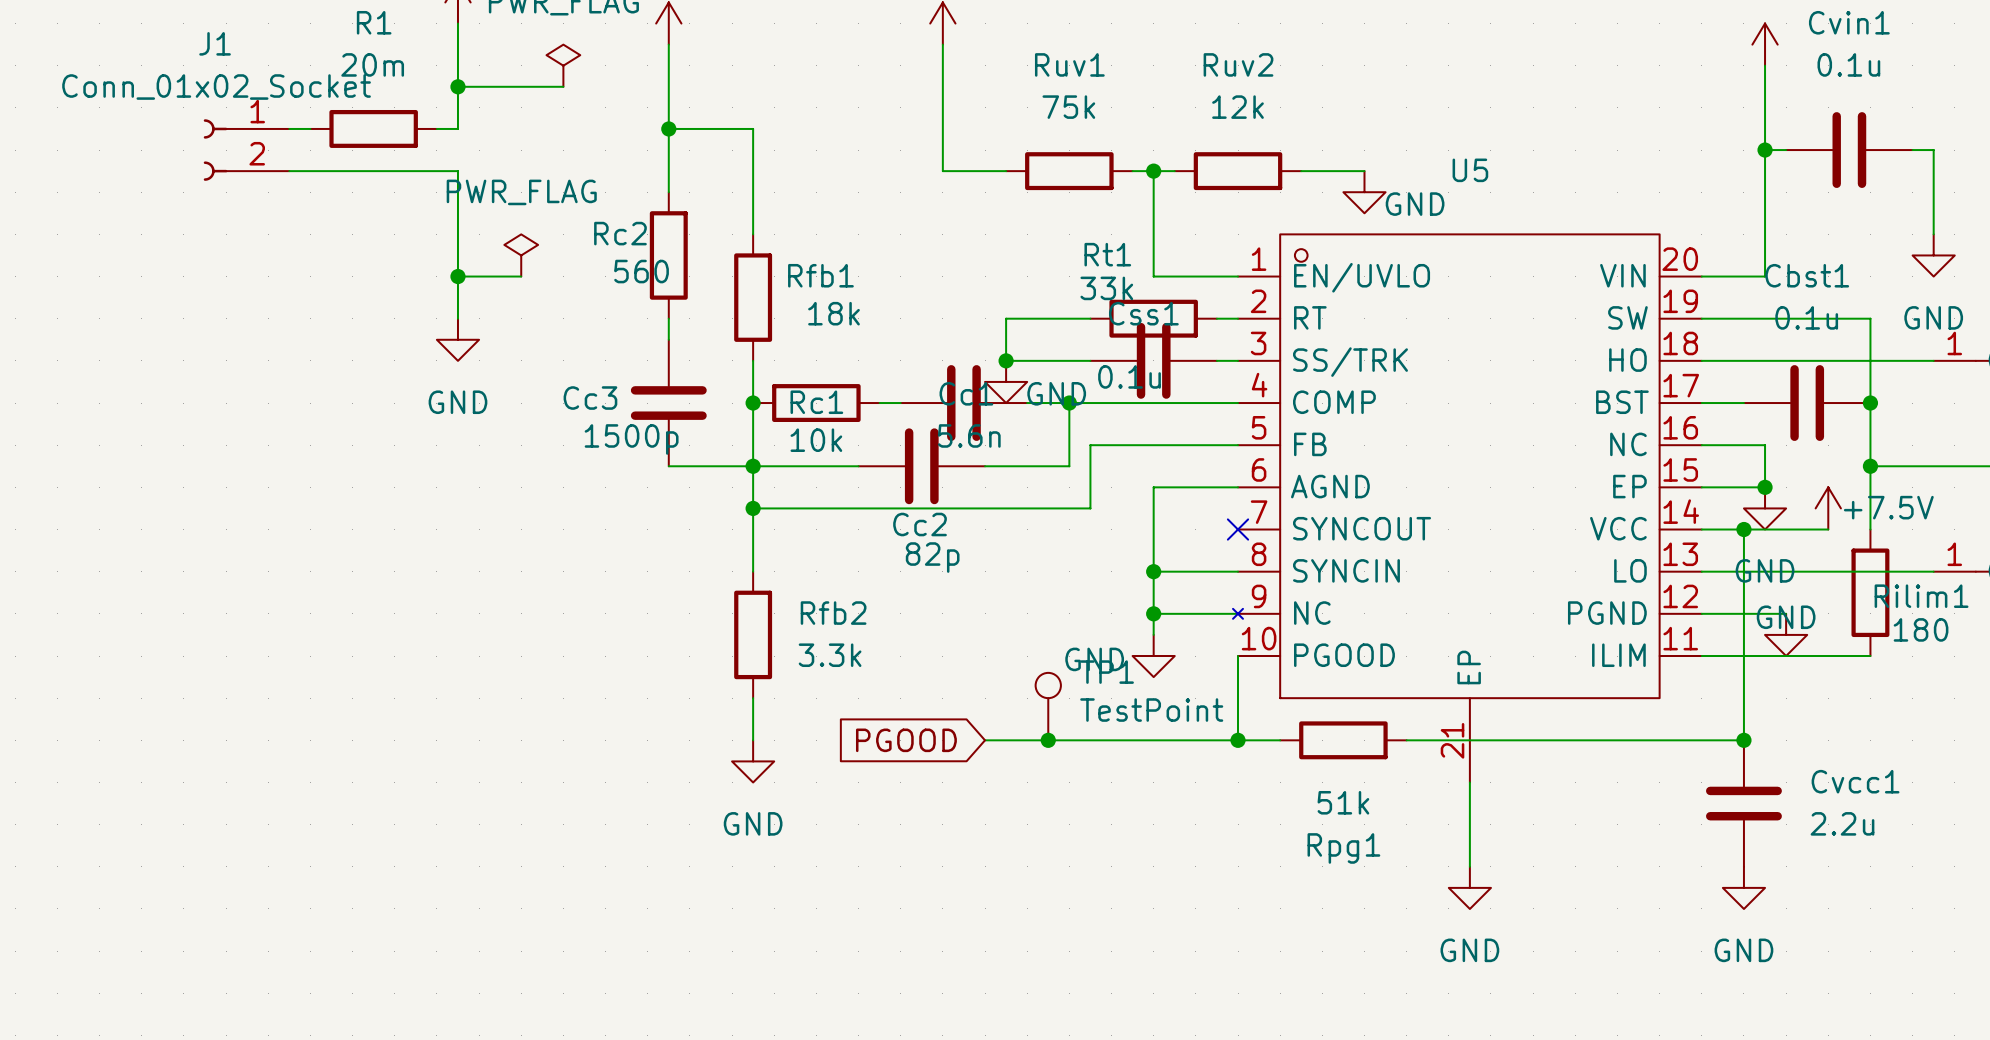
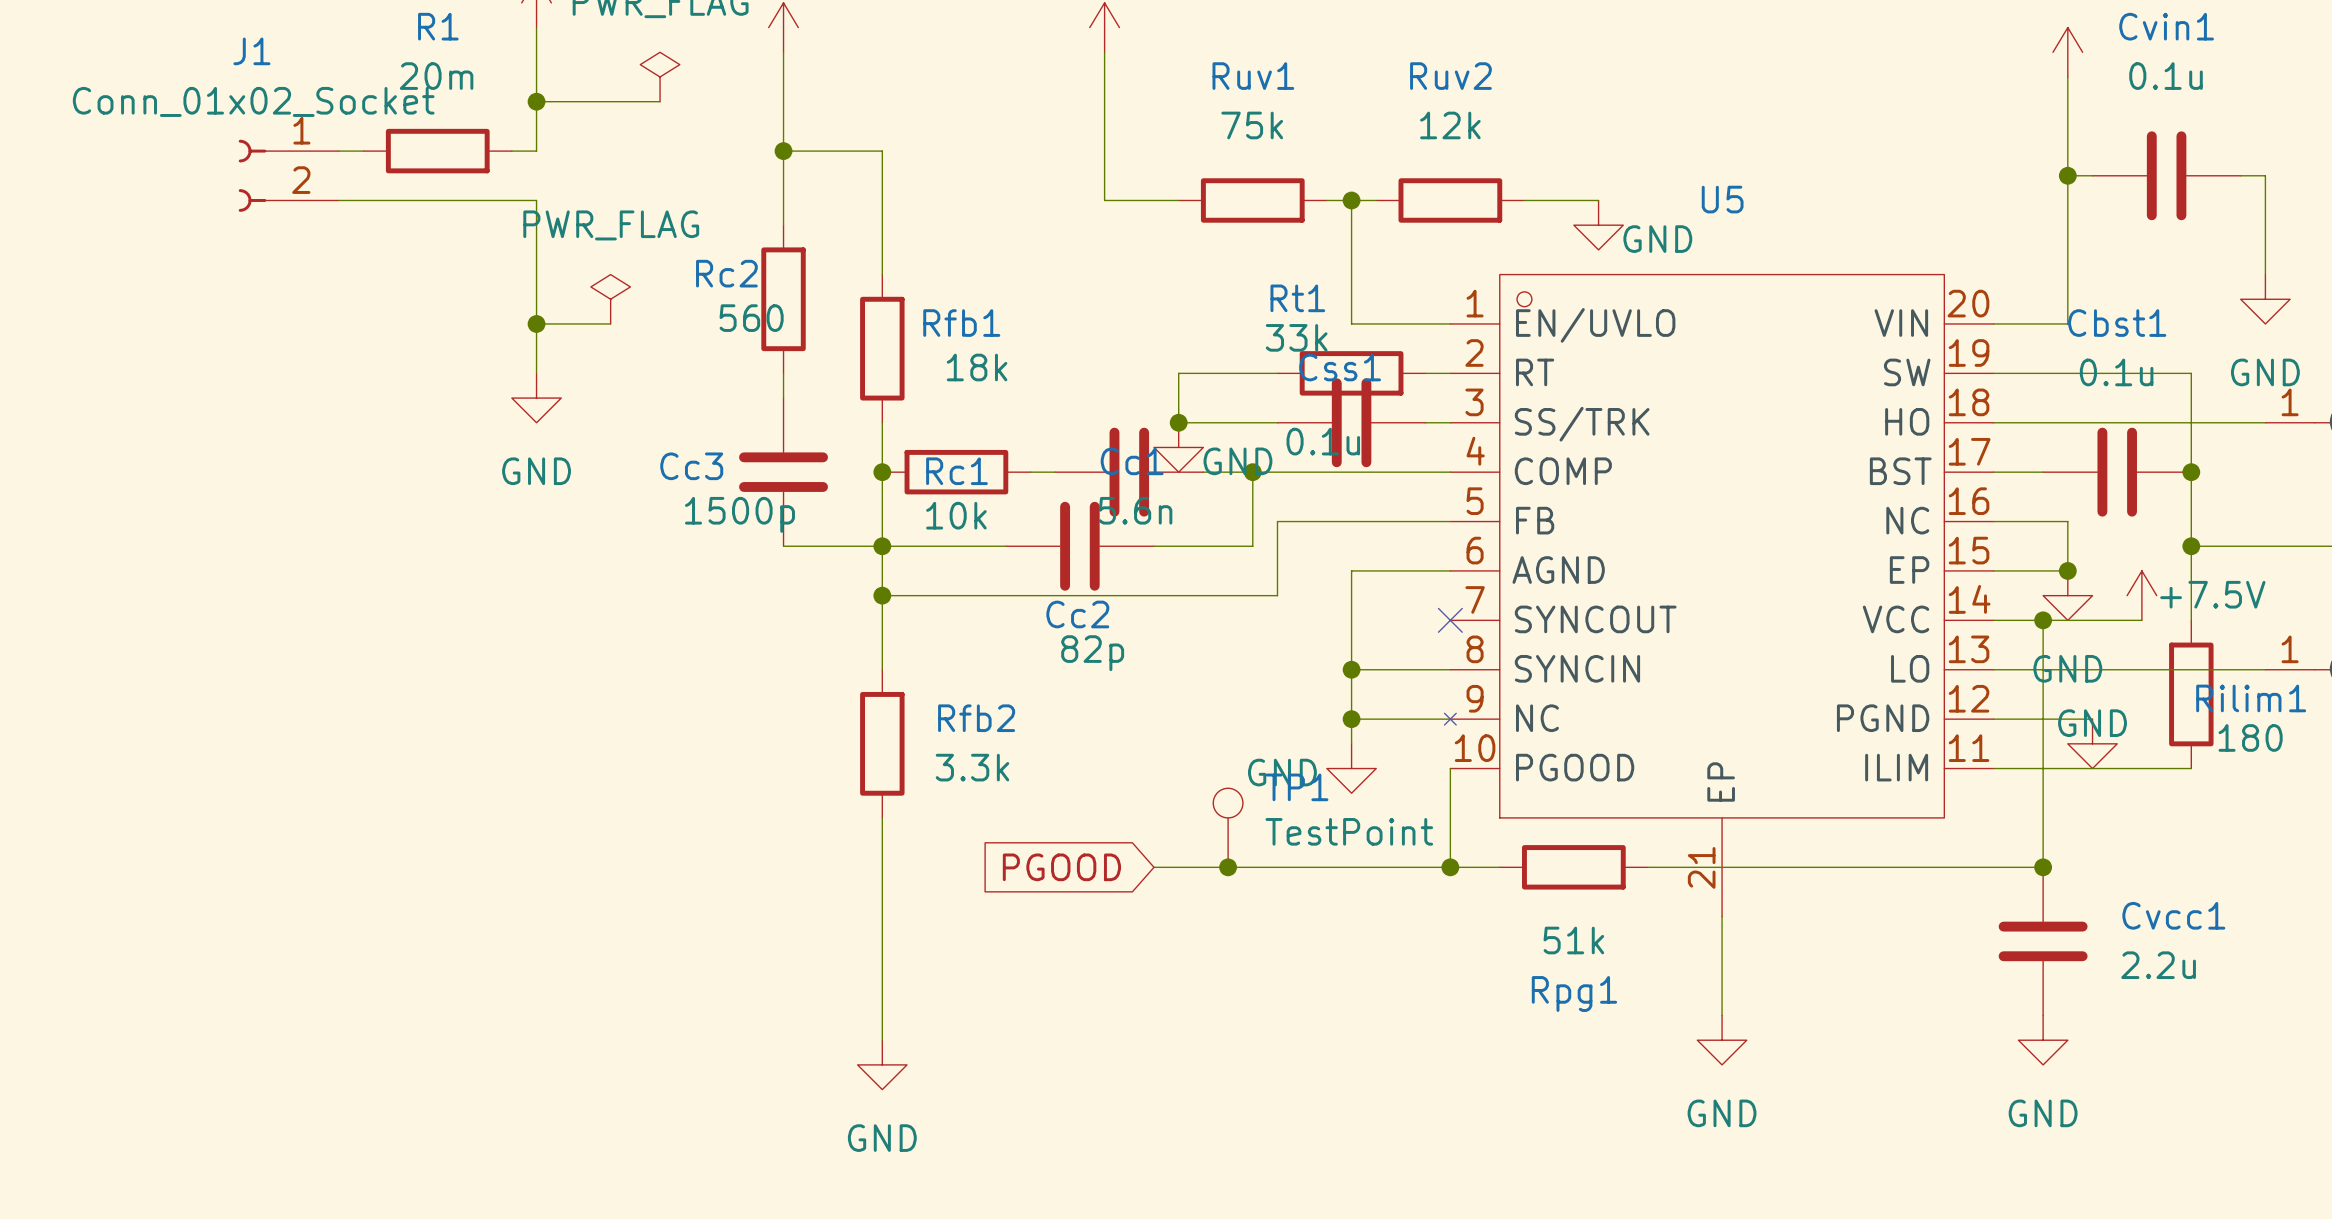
wire: none -> (882, 867) (882, 1040)
power symbol position: GND (753, 761) -> GND (882, 1064)

